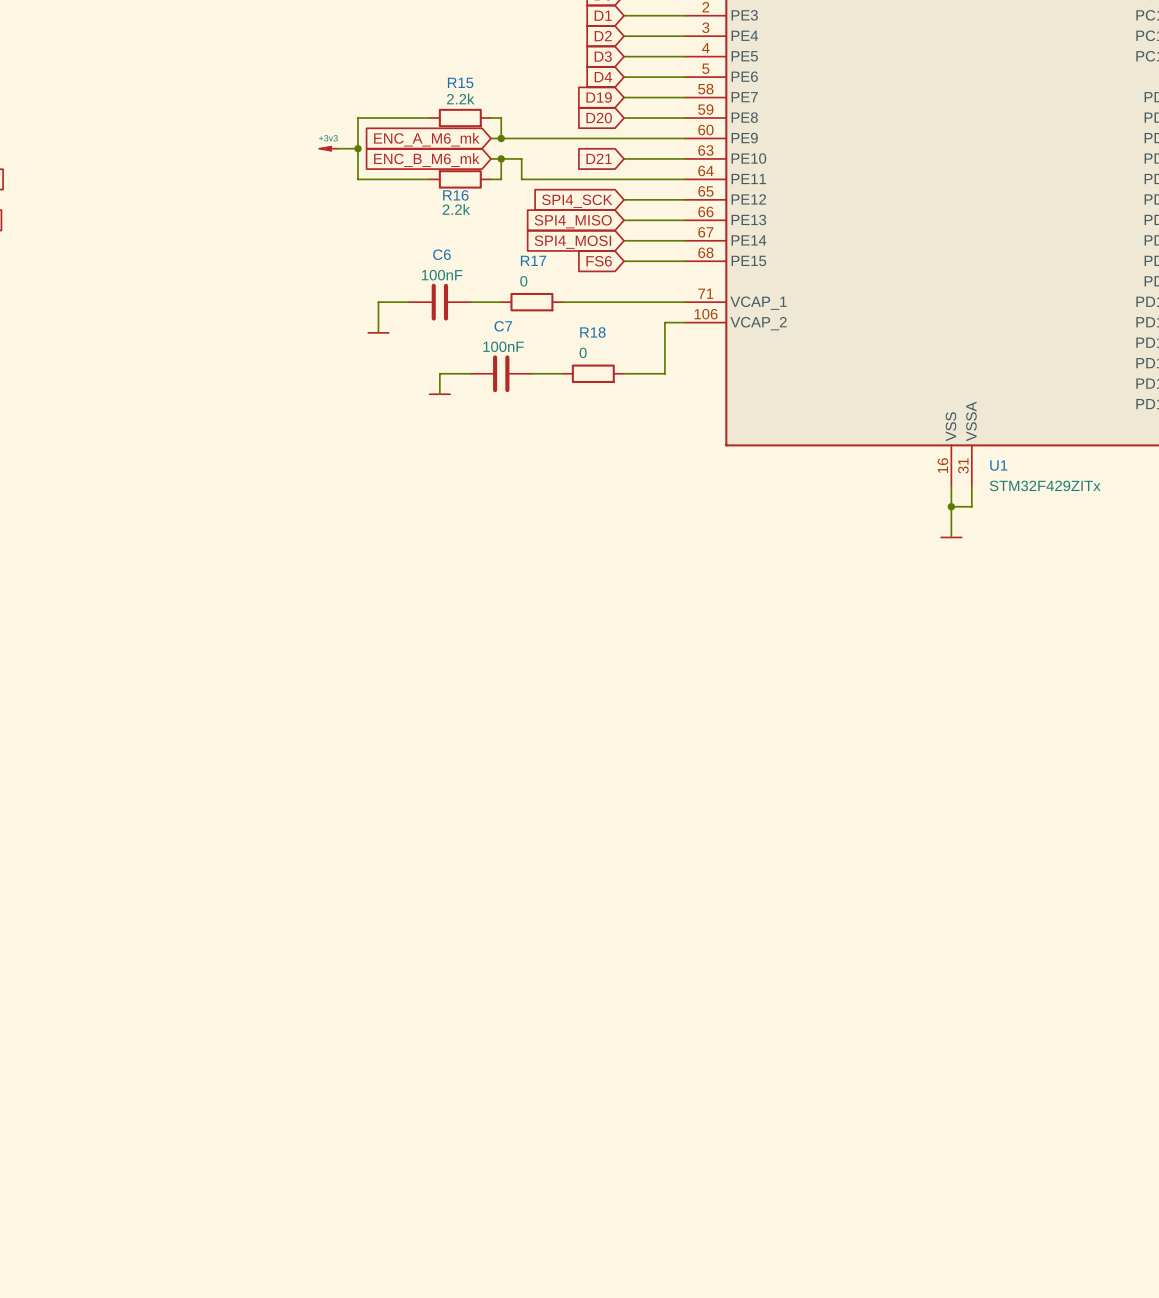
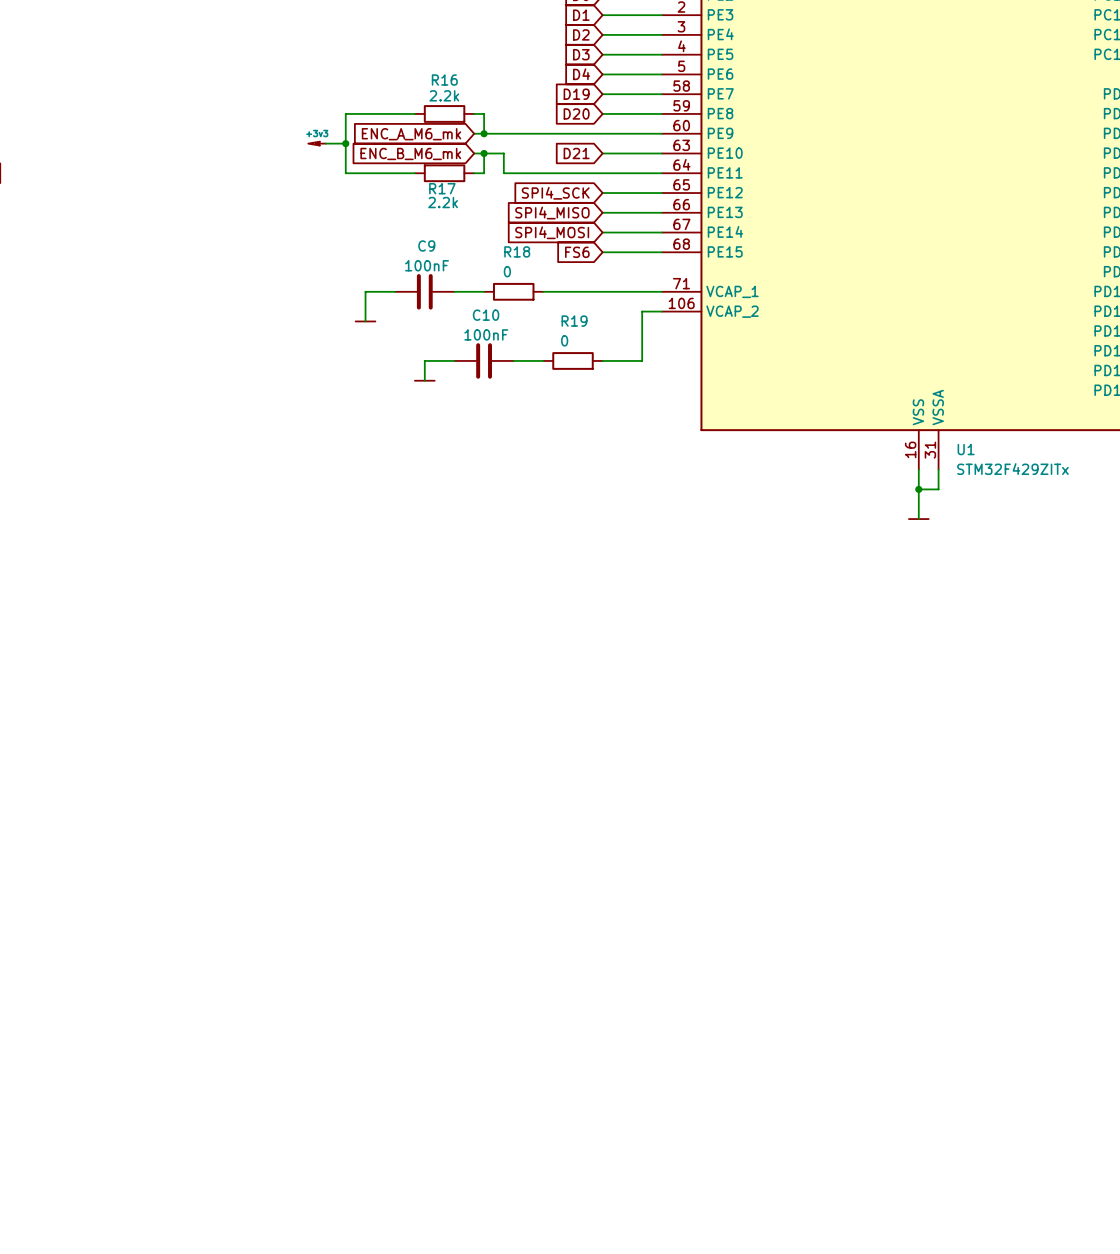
R15 name: R15 (460, 82) -> R16 (444, 80)
R16 name: R16 (455, 195) -> R17 (442, 188)
C6 name: C6 (441, 254) -> C9 (426, 246)
R17 name: R17 (533, 260) -> R18 (517, 251)
C7 name: C7 (503, 326) -> C10 (486, 315)
R18 name: R18 (592, 332) -> R19 (574, 321)

